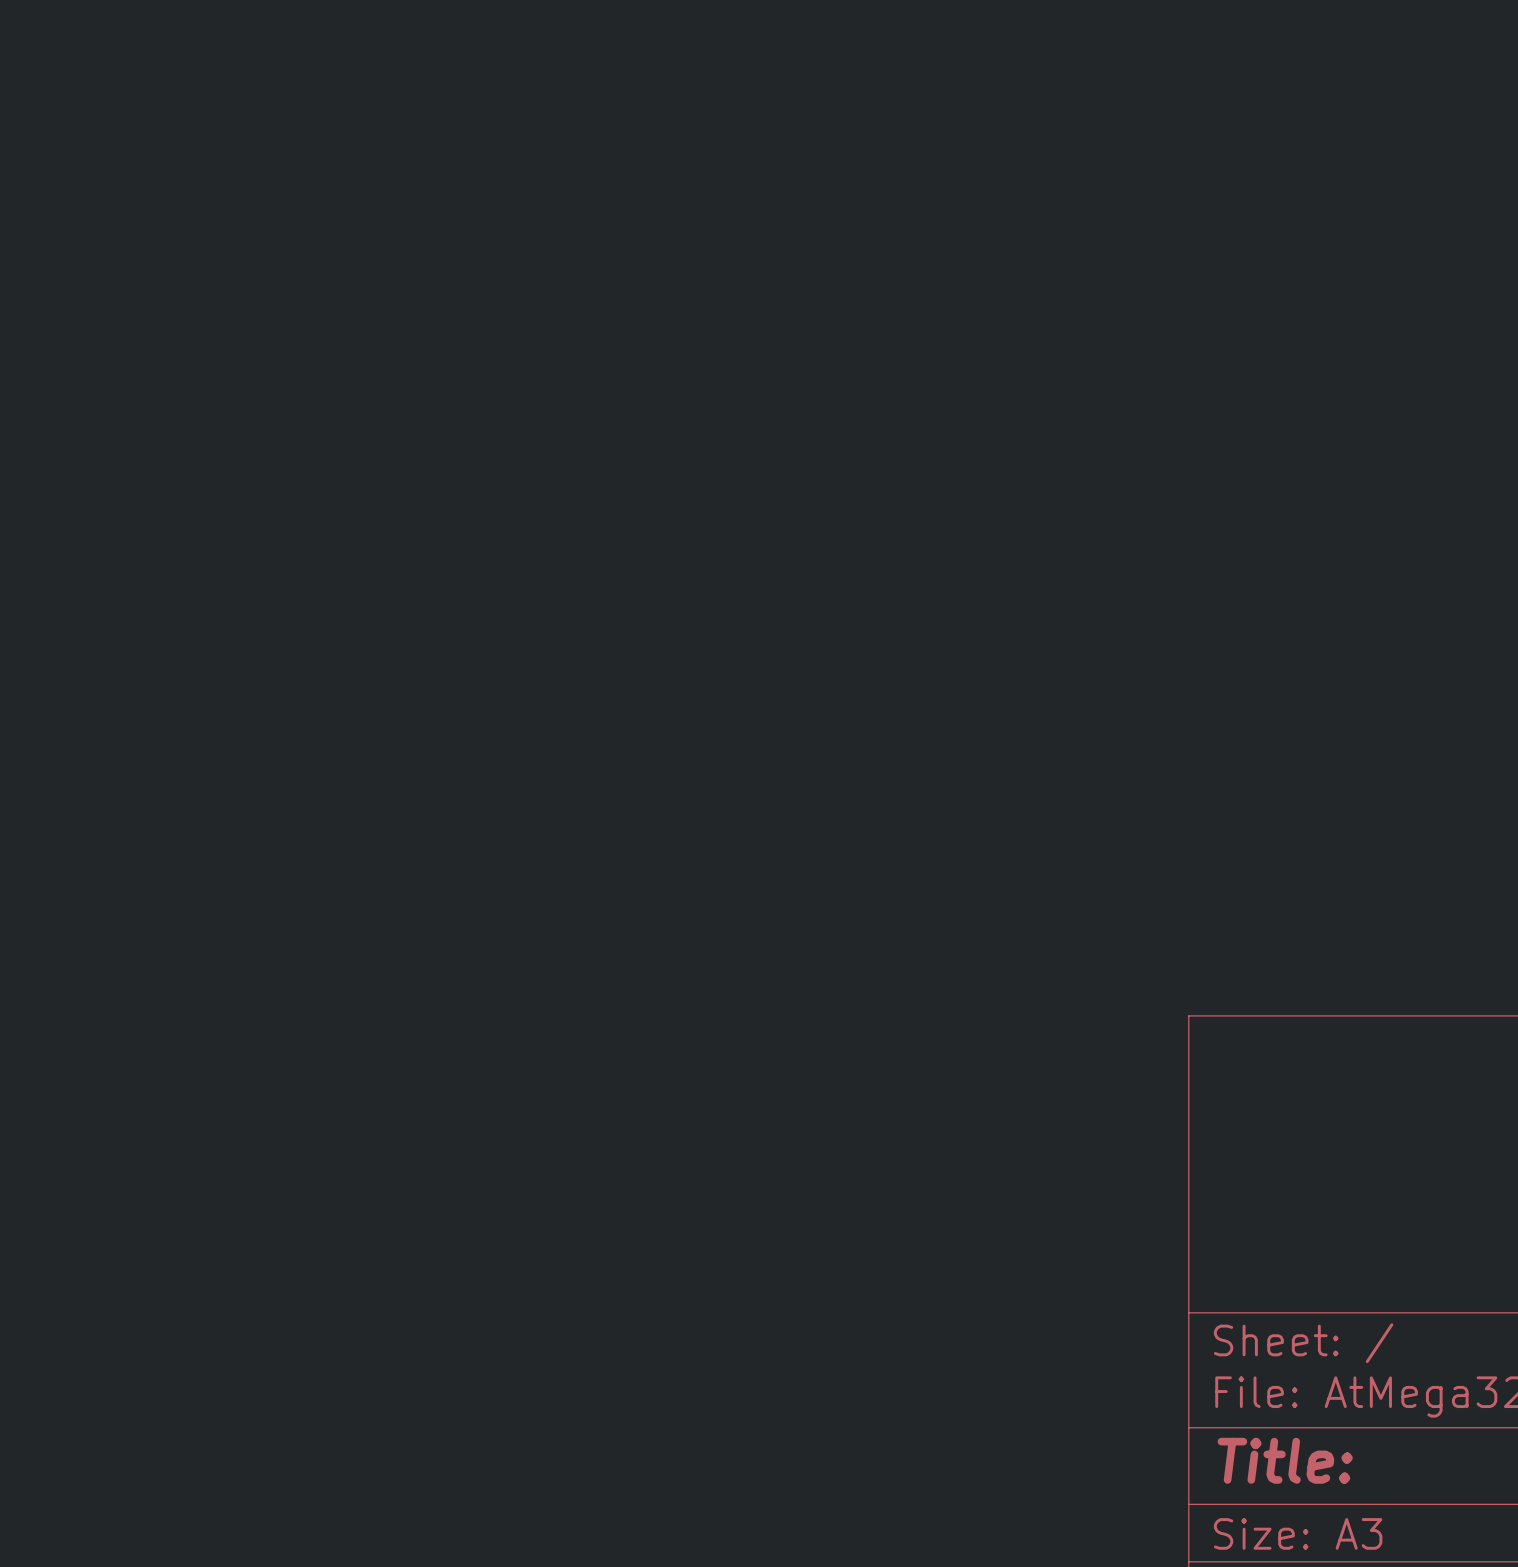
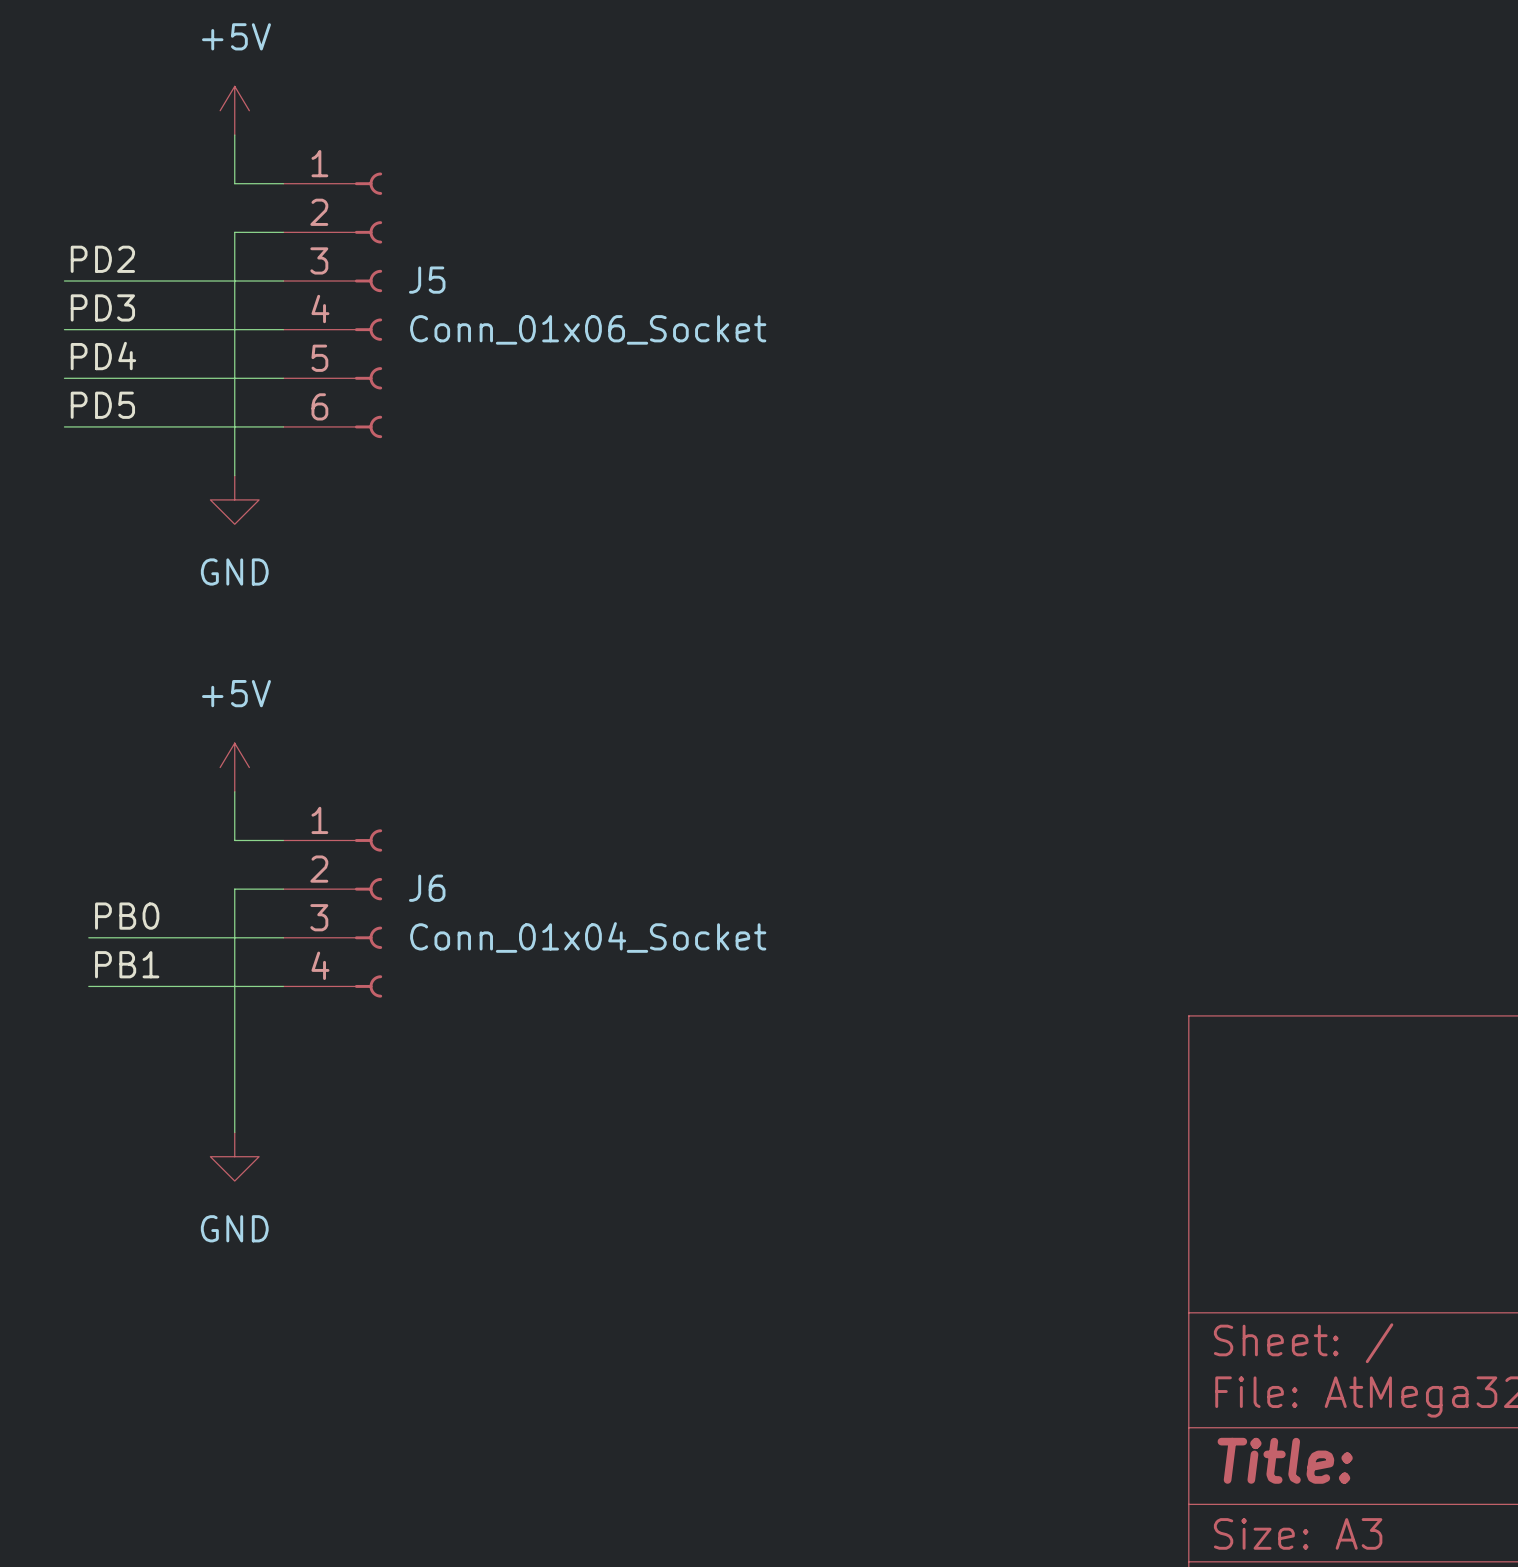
power symbol: none -> +5V (234, 110)
wire: none -> (234, 135) (234, 183) (283, 183)
wire: none -> (283, 232) (234, 232) (234, 475)
label: none -> PD2 (102, 259)
wire: none -> (64, 281) (283, 281)
J5: none -> Conn_01x06_Socket (332, 305)
label: none -> PD3 (102, 307)
wire: none -> (64, 329) (283, 329)
label: none -> PD4 (103, 356)
wire: none -> (64, 378) (283, 378)
label: none -> PD5 (102, 405)
wire: none -> (64, 426) (283, 426)
power symbol: none -> GND (234, 499)
power symbol: none -> +5V (234, 767)
wire: none -> (234, 791) (234, 840) (283, 840)
wire: none -> (283, 889) (234, 889) (234, 1132)
J6: none -> Conn_01x04_Socket (332, 913)
label: none -> PB0 (127, 916)
wire: none -> (88, 937) (283, 937)
label: none -> PB1 (127, 964)
wire: none -> (88, 986) (283, 986)
power symbol: none -> GND (234, 1156)

